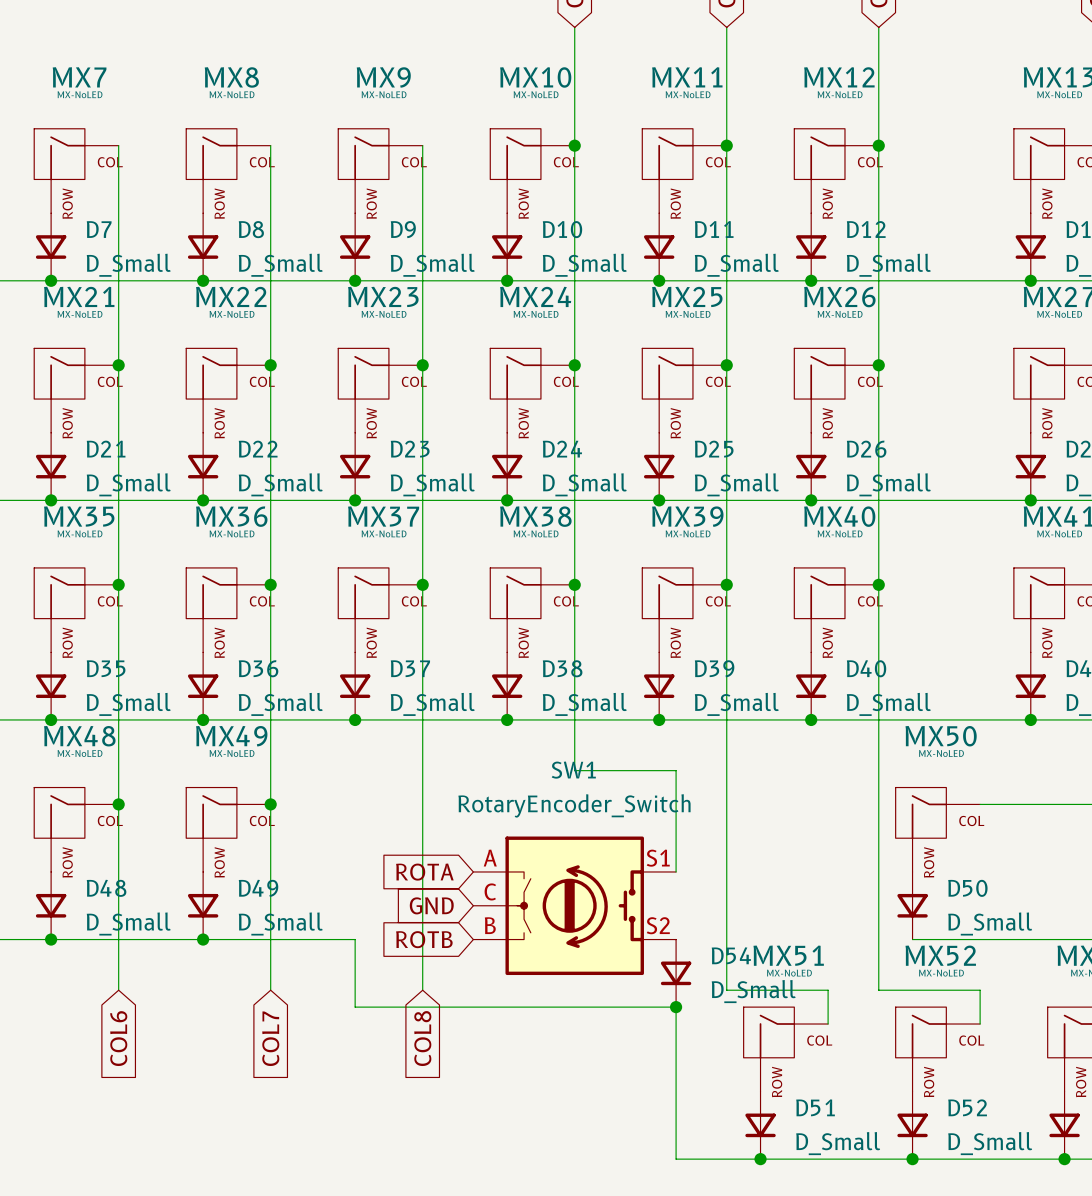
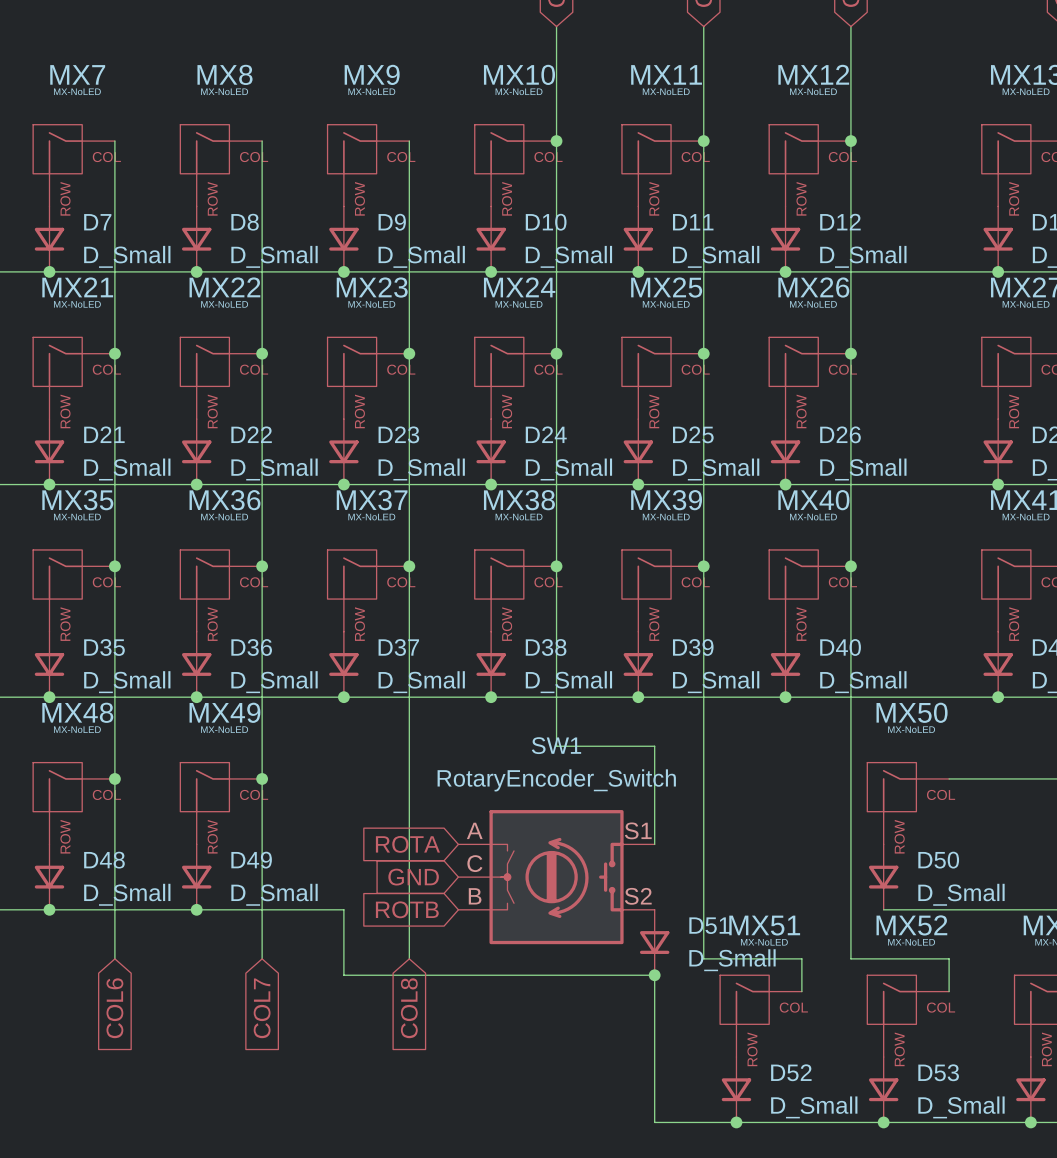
D54 name: D54 (731, 955) -> D51 (709, 925)
D51 name: D51 (815, 1107) -> D52 (791, 1072)
D52 name: D52 (967, 1107) -> D53 (938, 1072)

